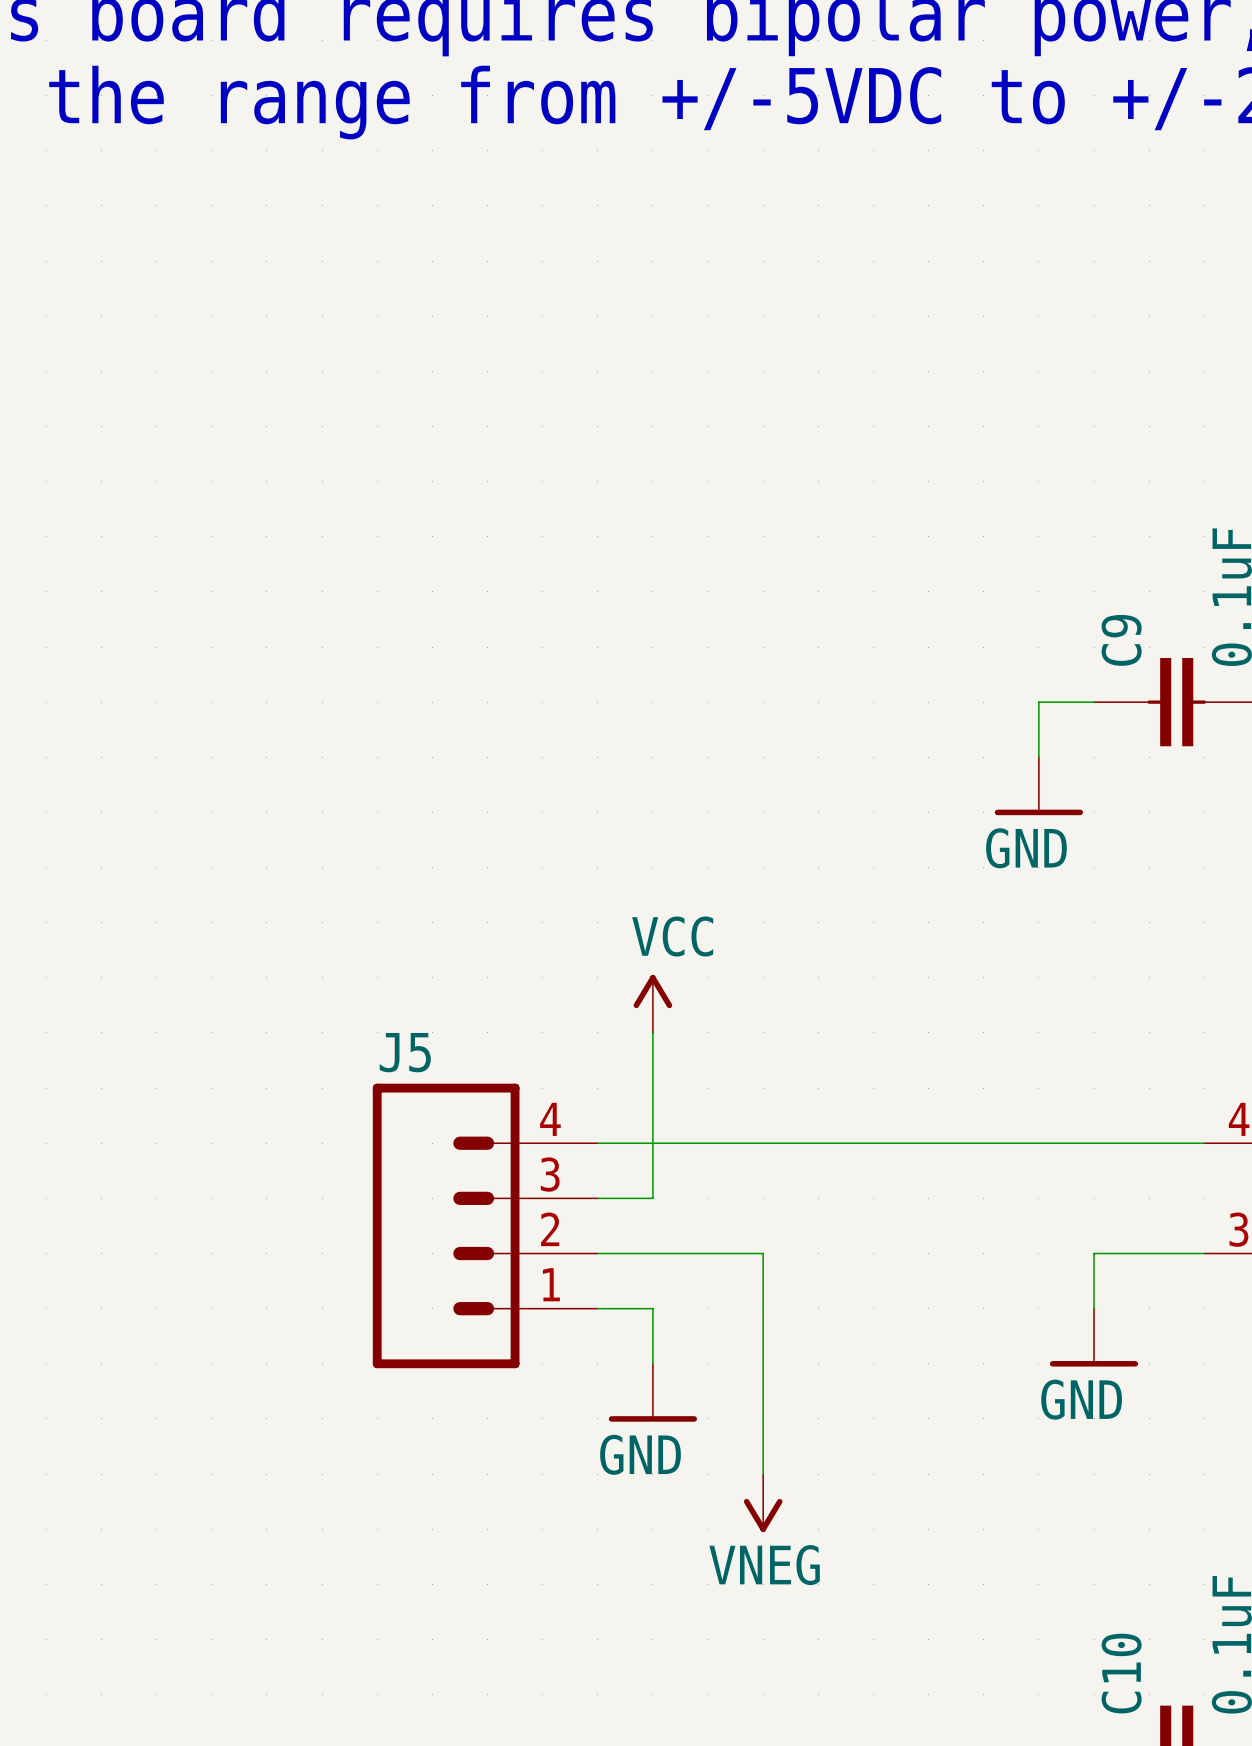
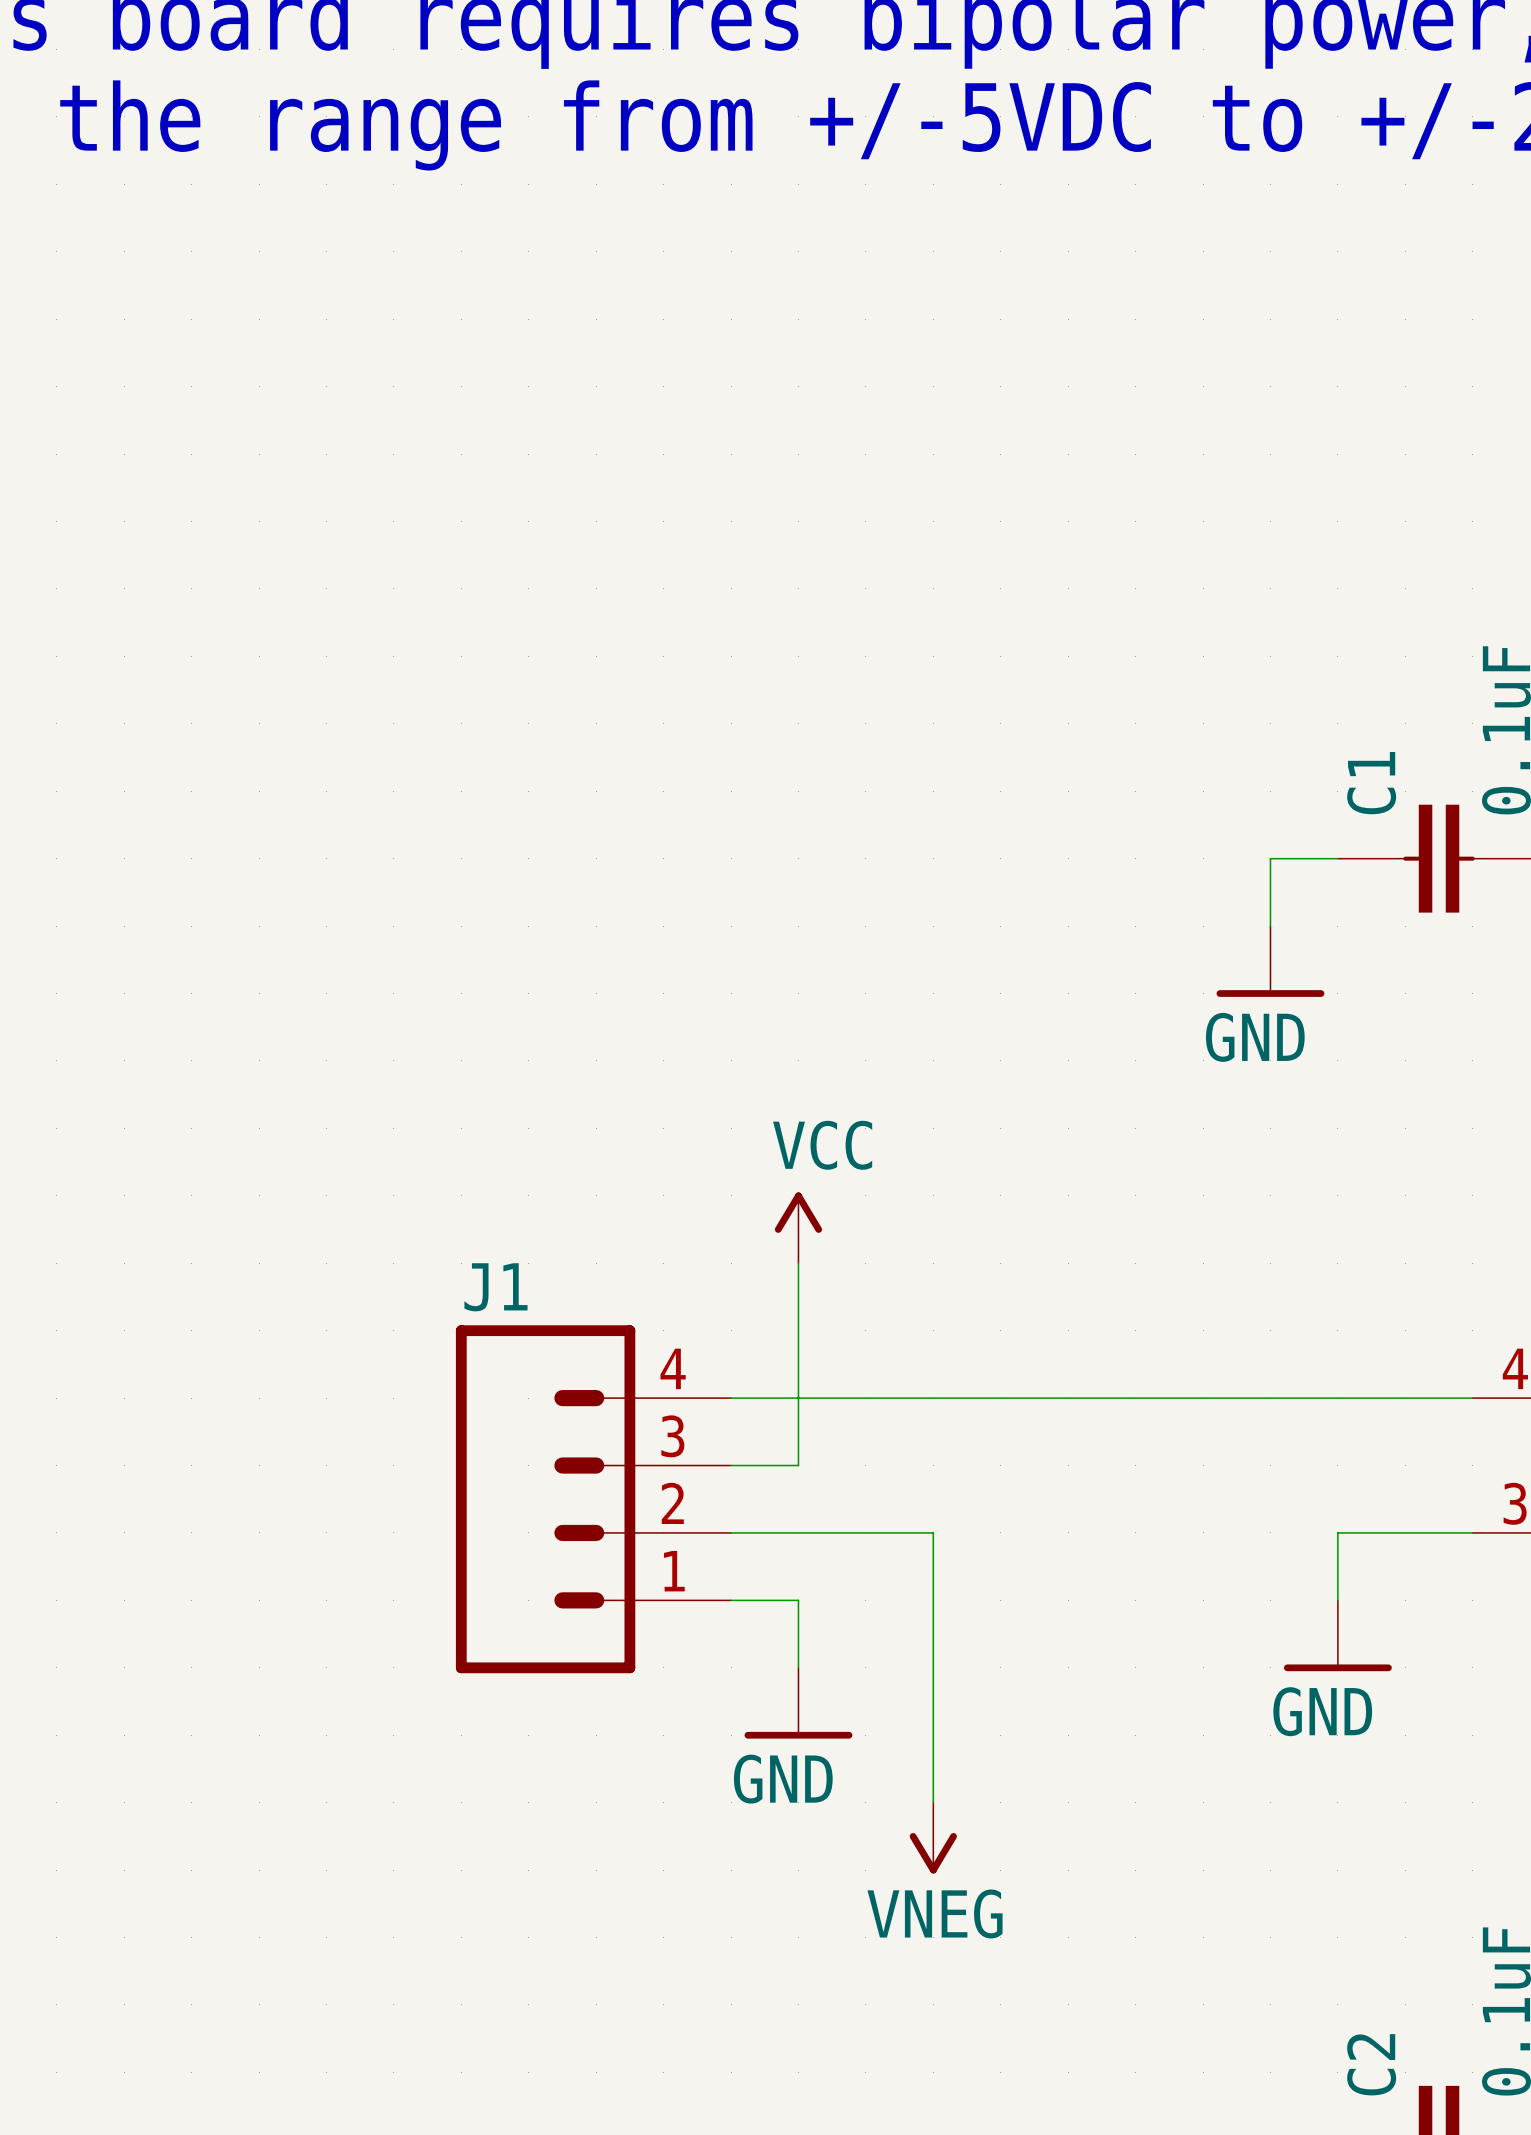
C9 name: C9 (1121, 640) -> C1 (1371, 783)
J5 name: J5 (405, 1052) -> J1 (495, 1287)
C10 name: C10 (1121, 1673) -> C2 (1371, 2064)

